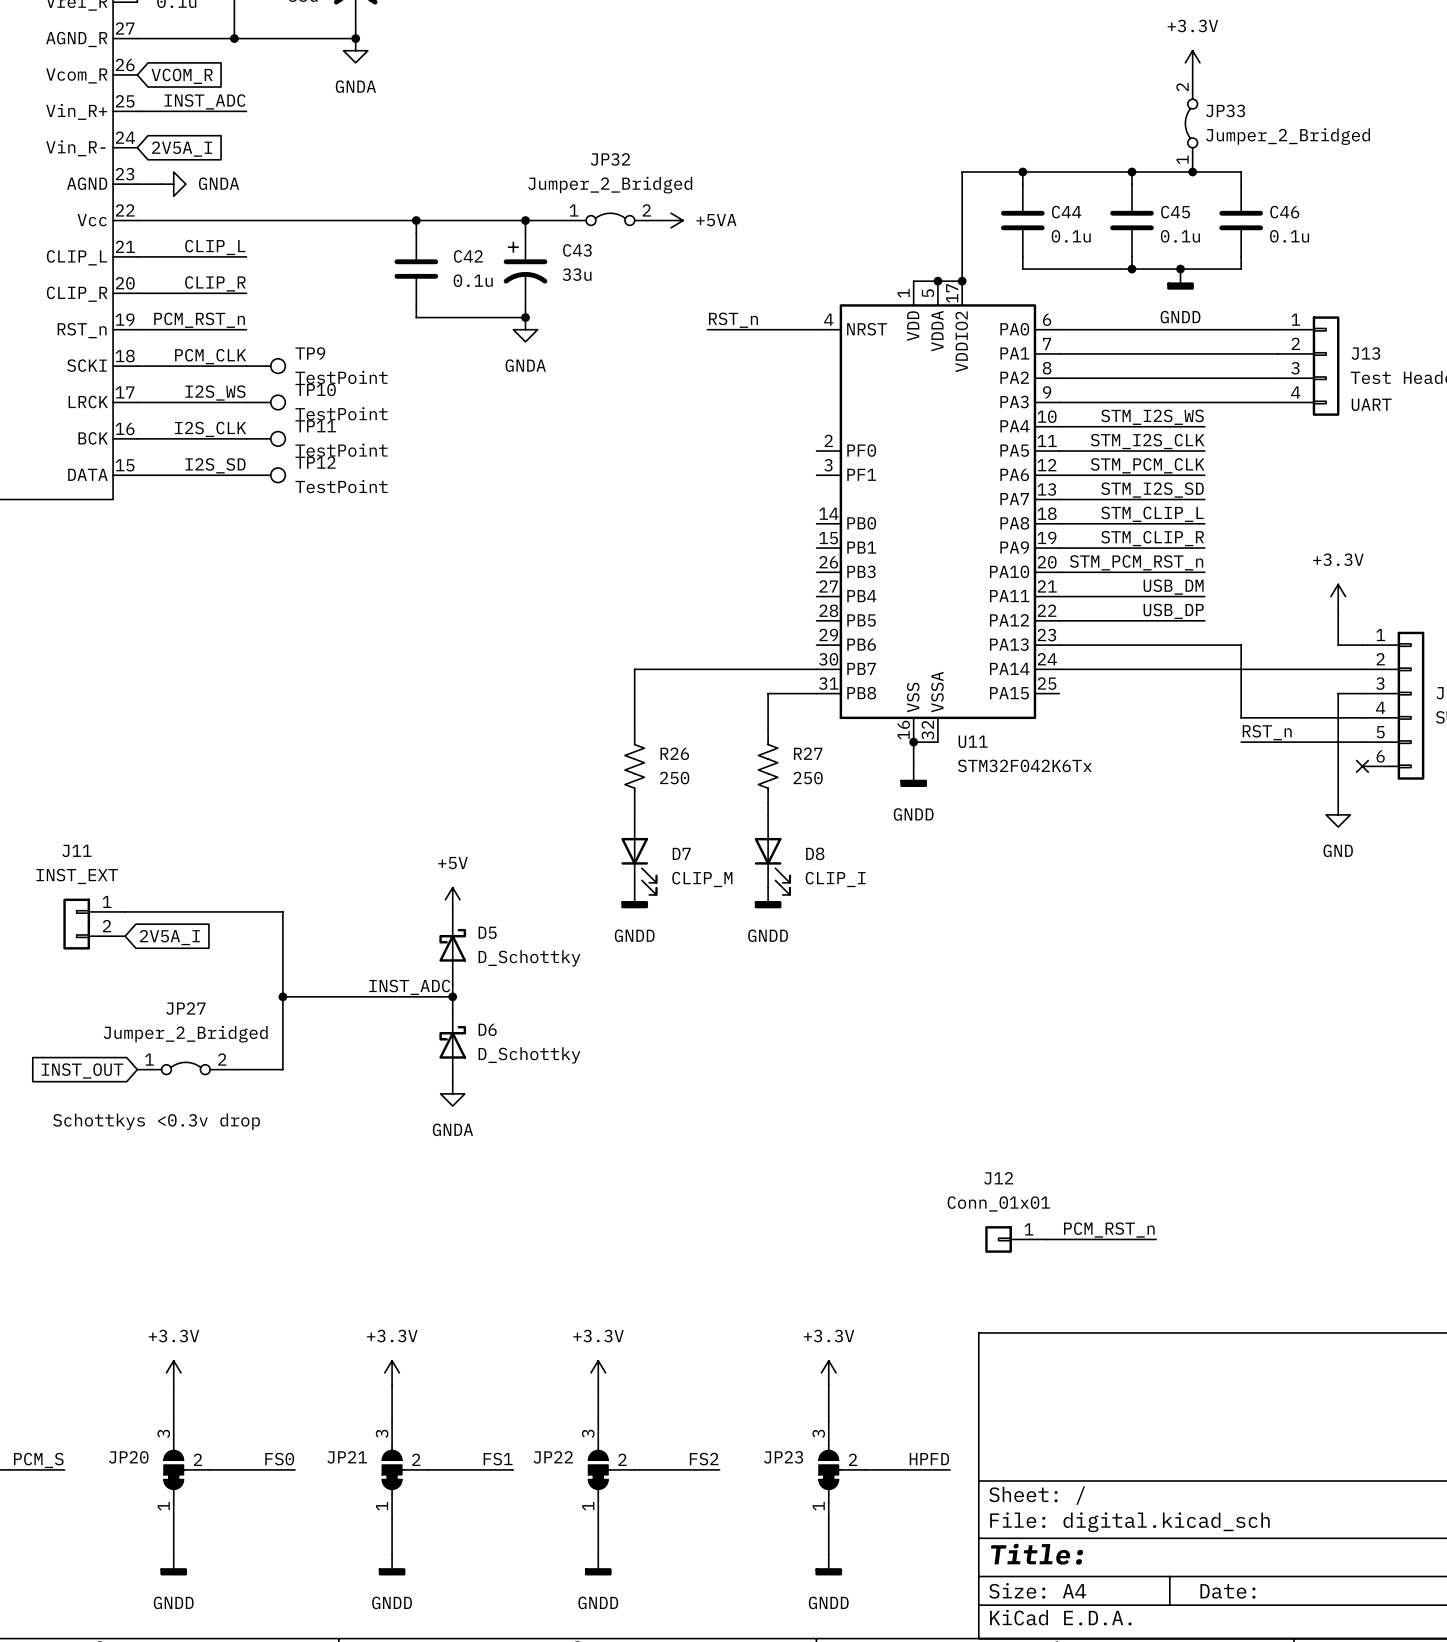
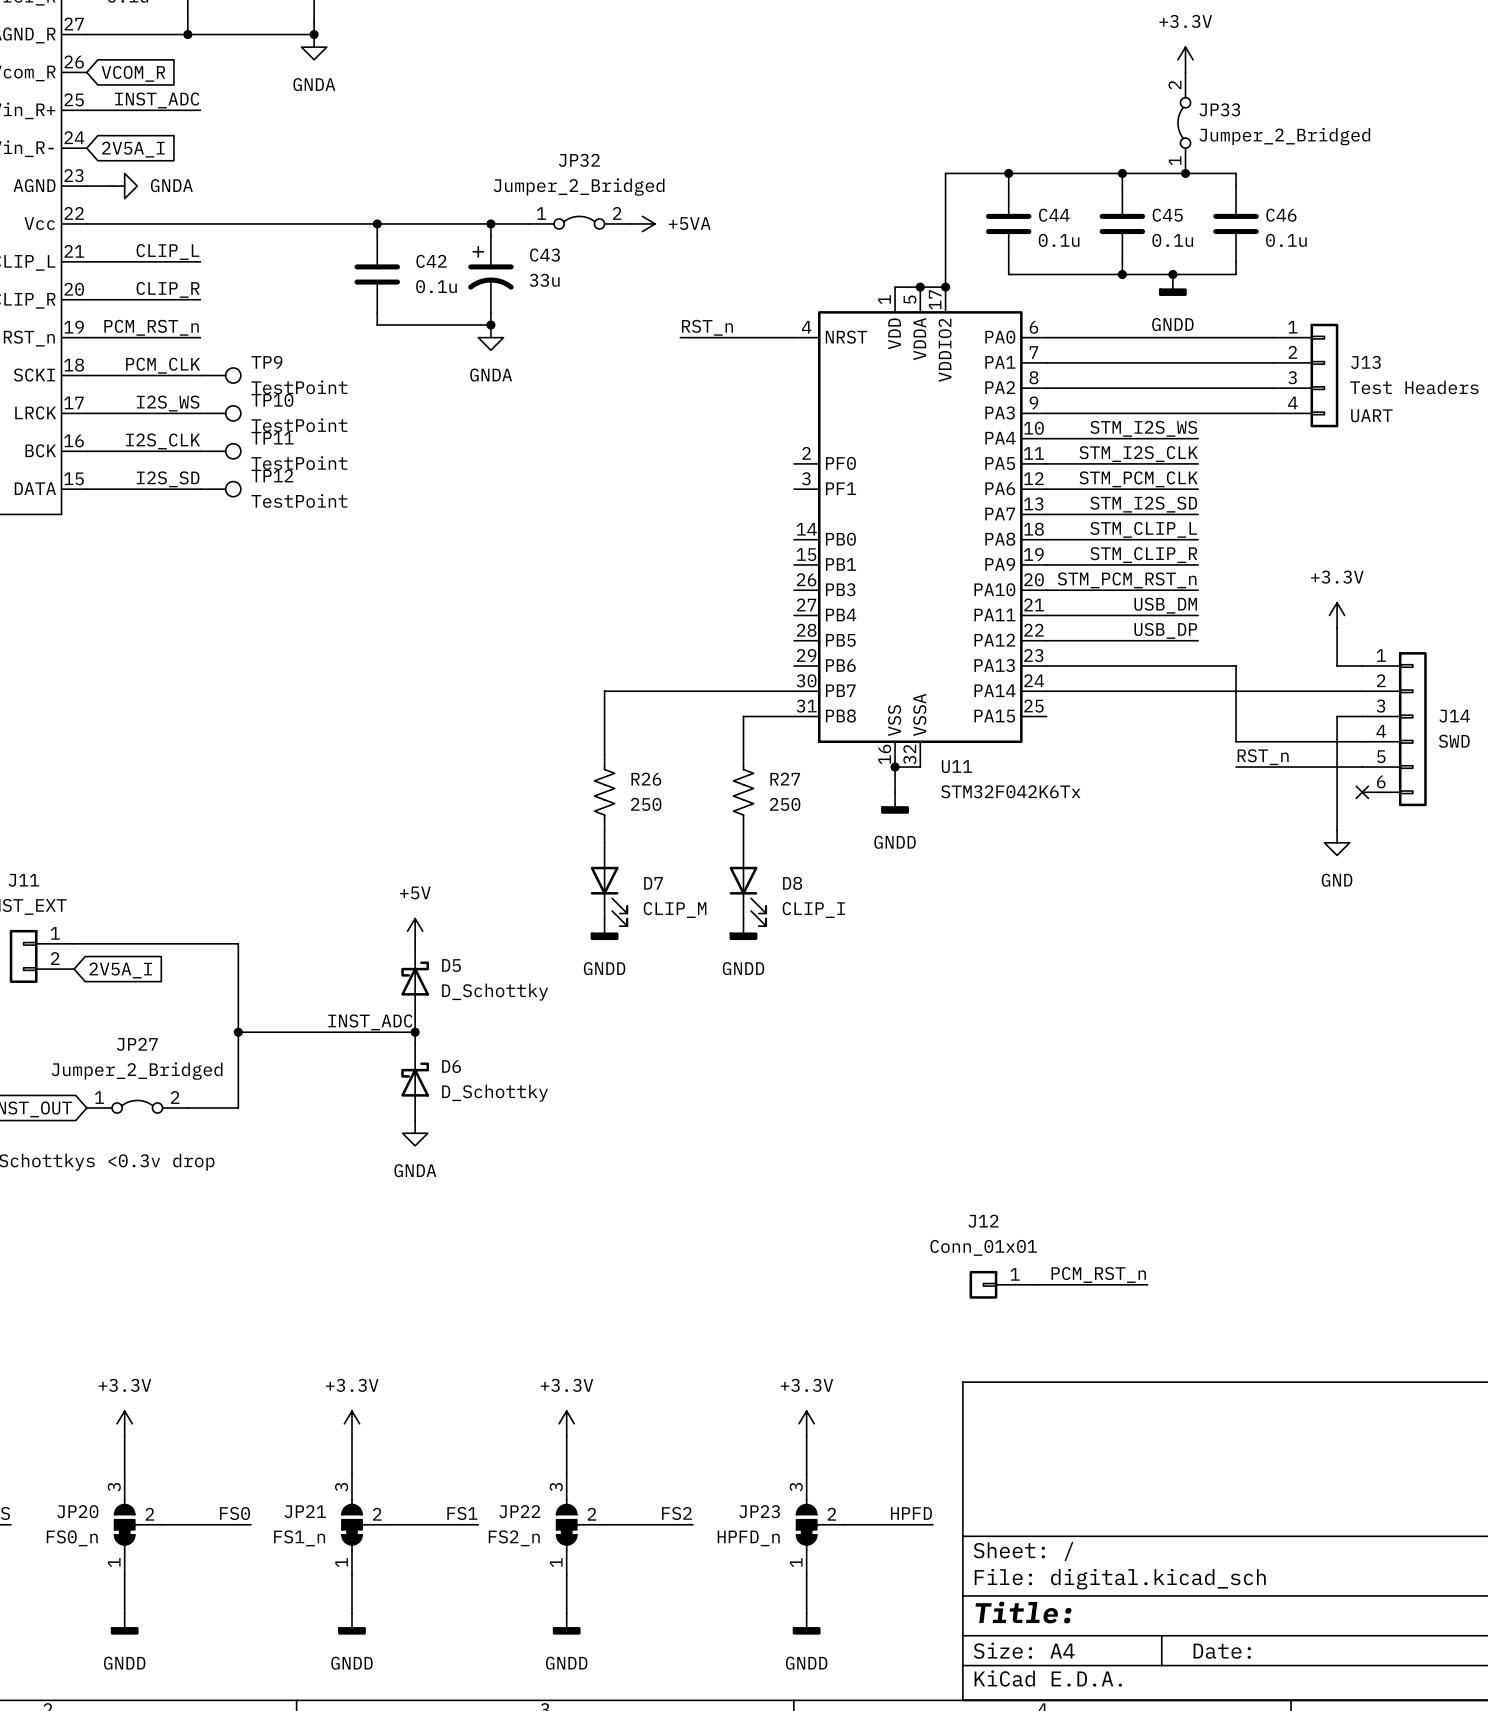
JP20 value: none -> FS0_n (72, 1538)
JP21 value: none -> FS1_n (299, 1538)
JP22 value: none -> FS2_n (514, 1538)
JP23 value: none -> HPFD_n (748, 1538)

